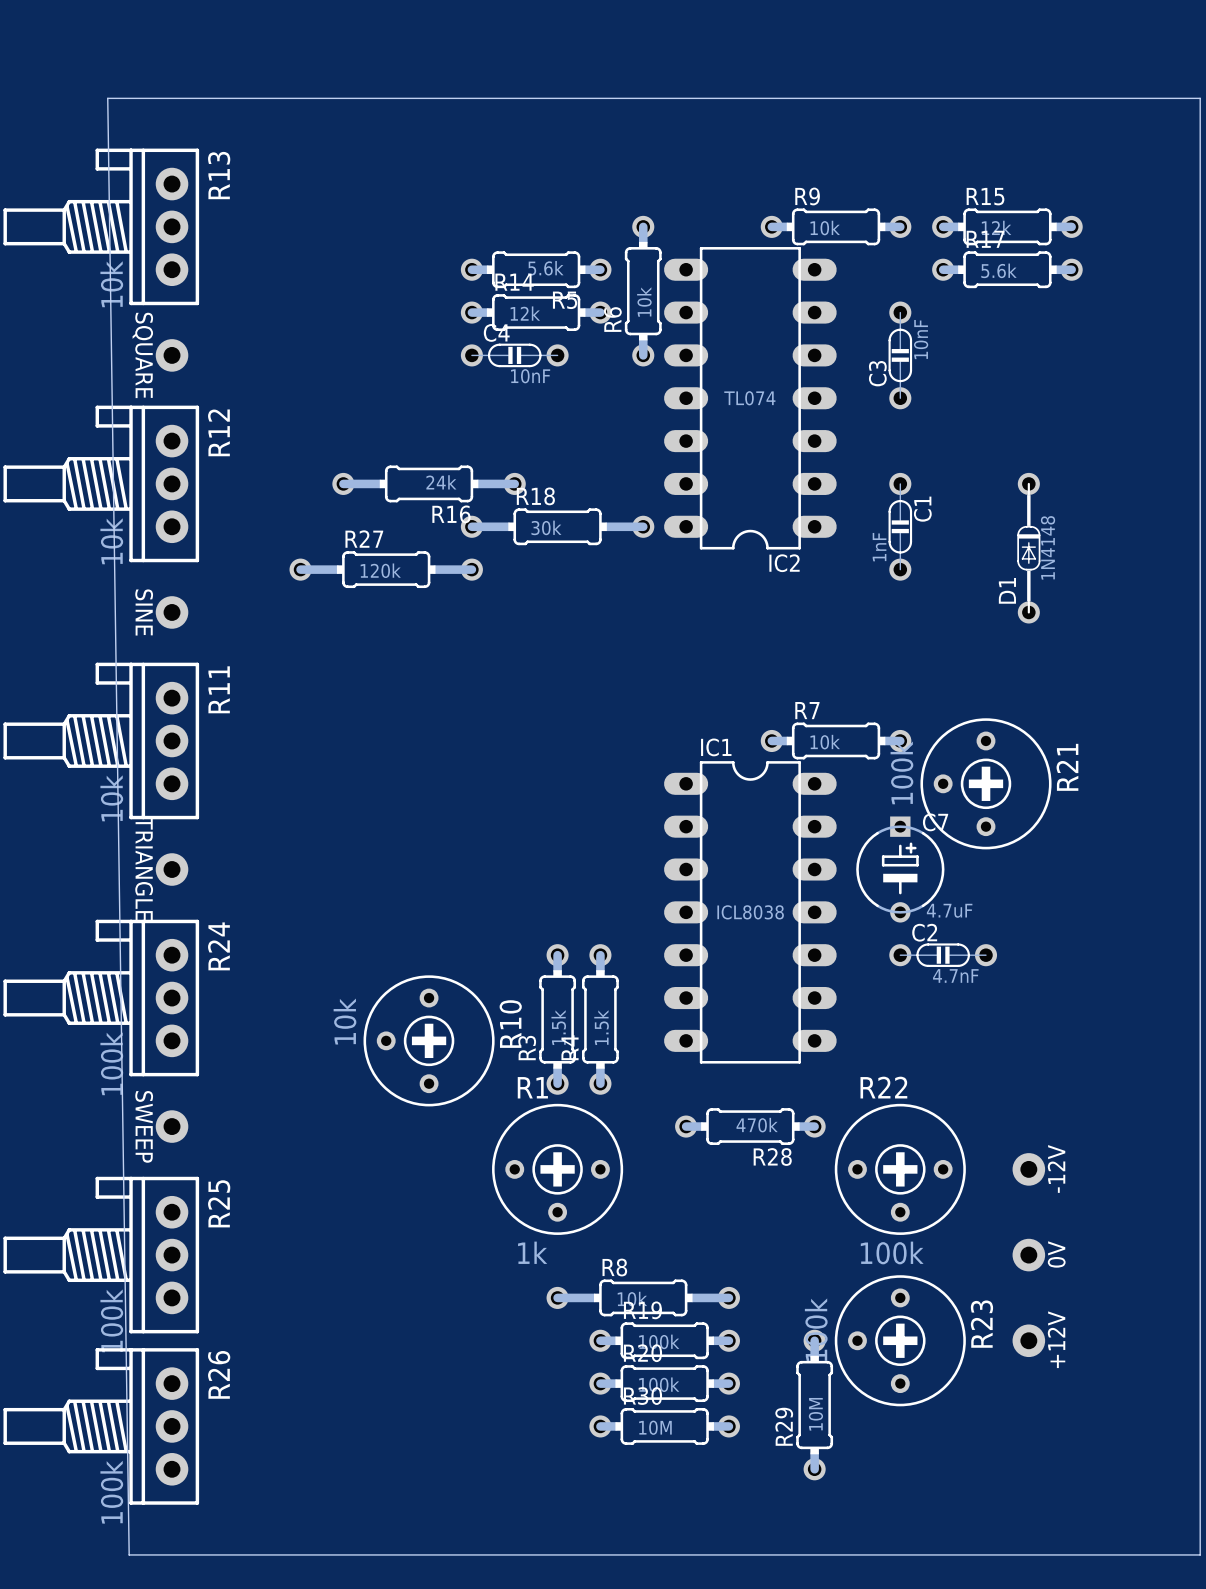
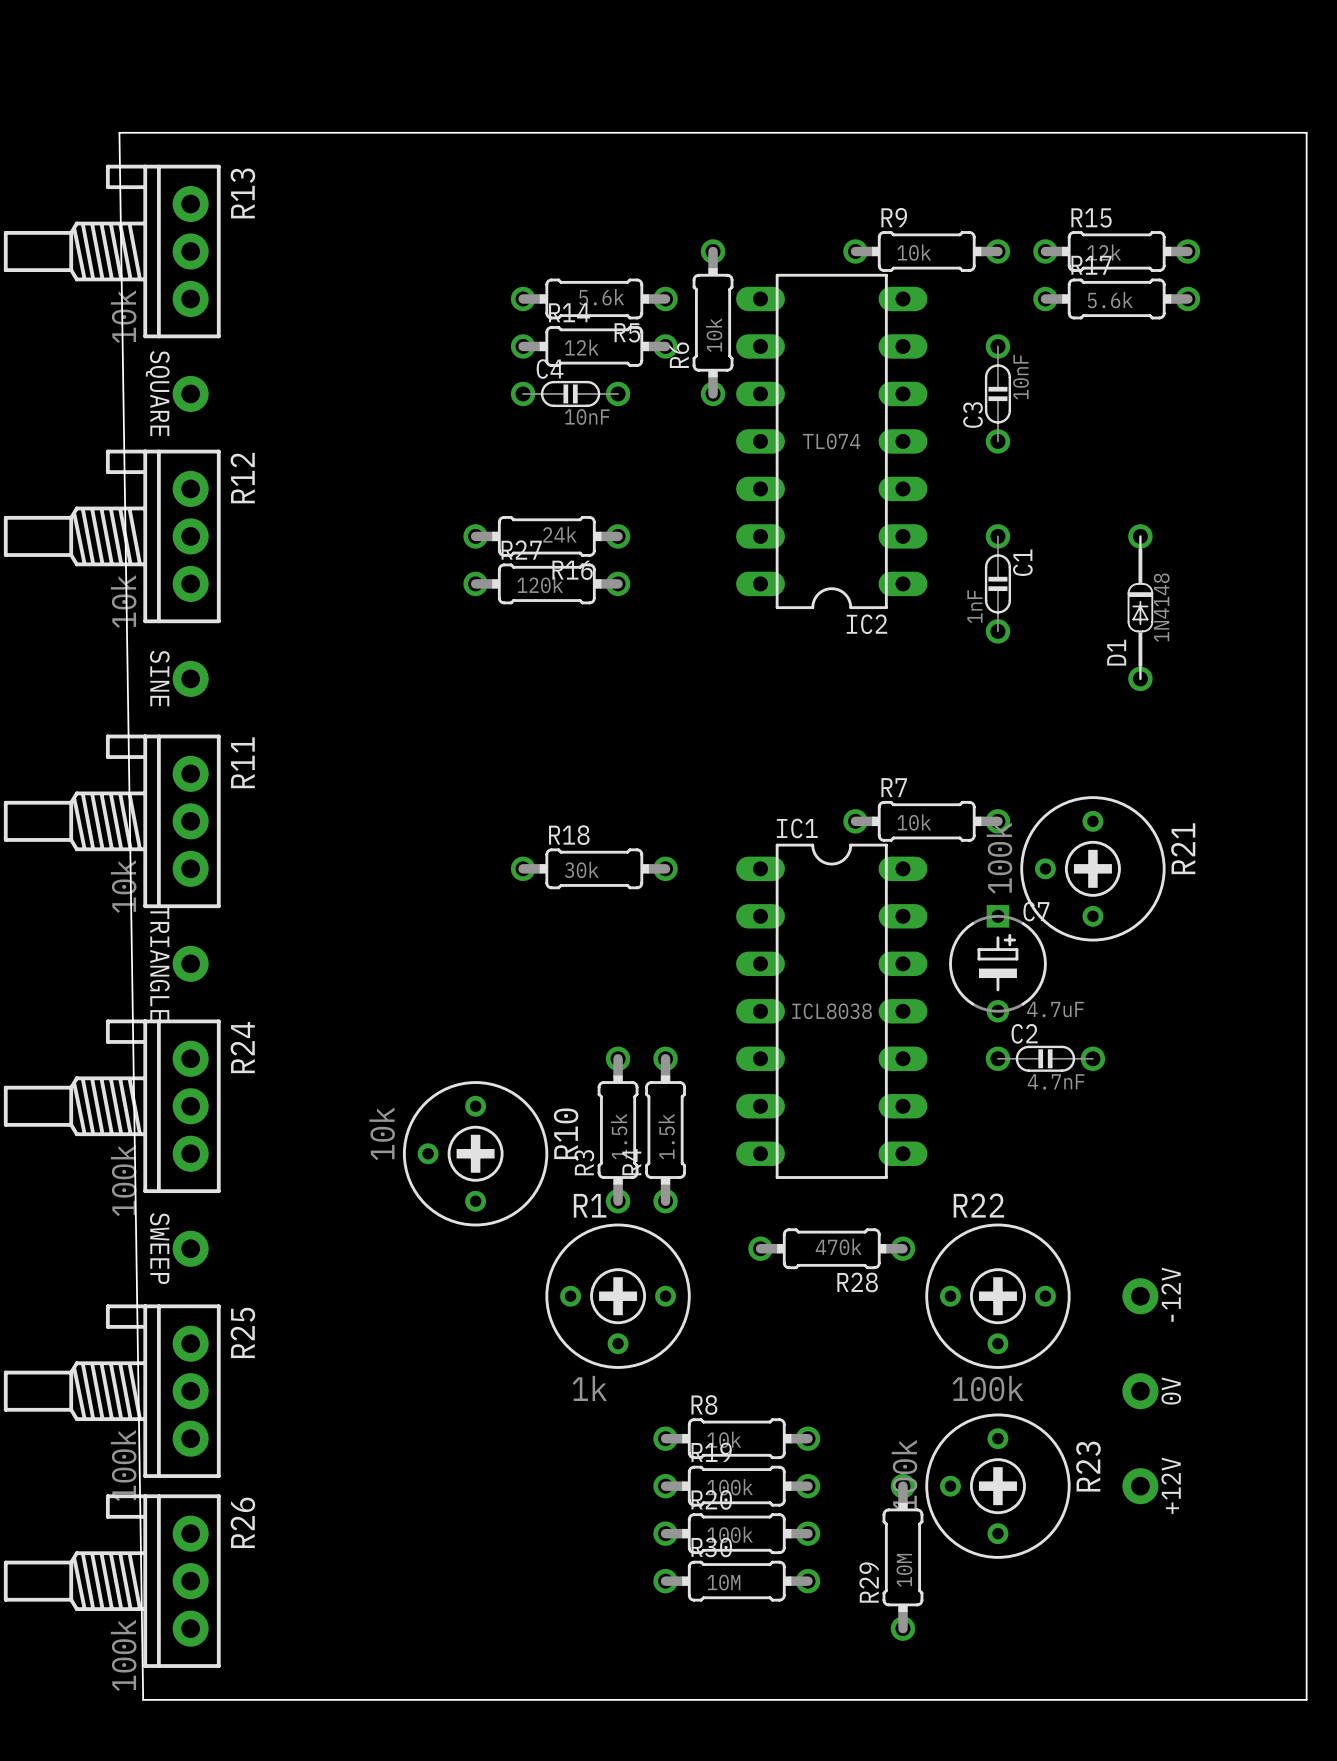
board edge: (107, 98) (1200, 98) (1200, 1554) (129, 1554) (107, 98) -> (119, 132) (143, 1699) (1306, 1699) (1306, 132) (119, 132)
R16 footprint: [332, 465, 526, 503] -> [463, 516, 631, 557]
R18 footprint: [460, 508, 655, 546] -> [510, 848, 678, 890]
R27 footprint: [289, 551, 483, 589] -> [463, 563, 631, 605]
R8 footprint: [546, 1279, 740, 1317] -> [653, 1418, 821, 1460]

